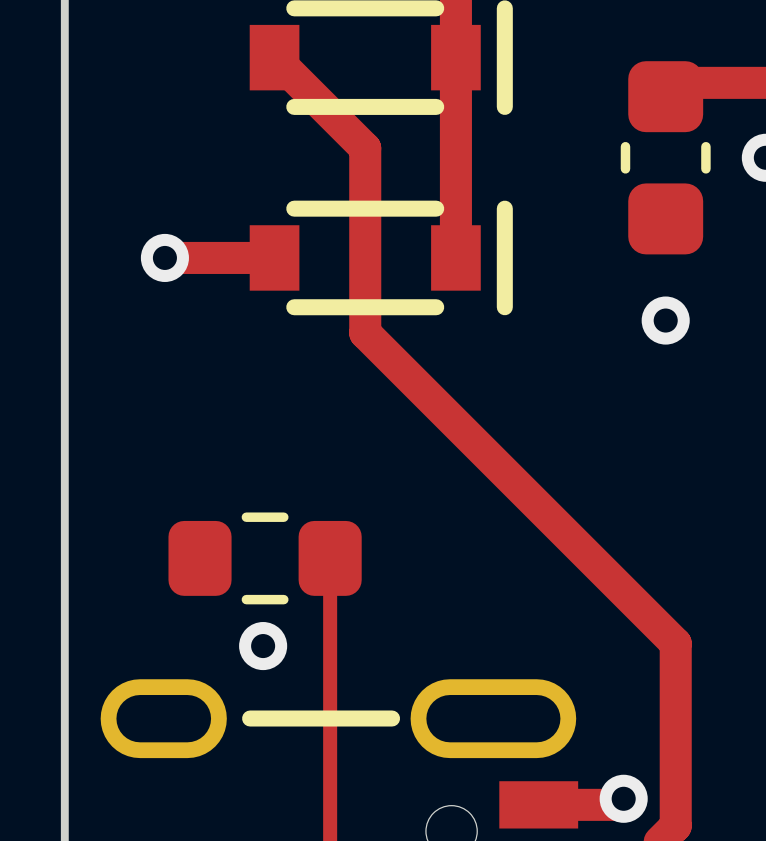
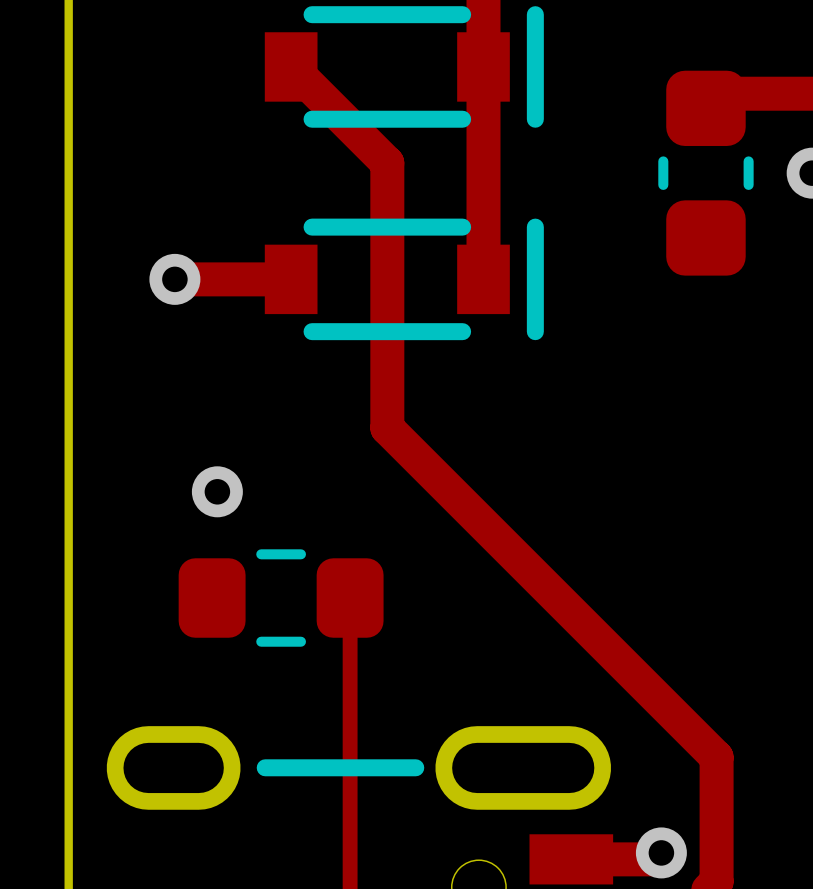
via: (665, 320) -> none
track: (365, 333) (675, 643) (675, 708) -> (387, 359) (387, 428) (716, 757)
via position: (263, 646) -> (217, 491)

